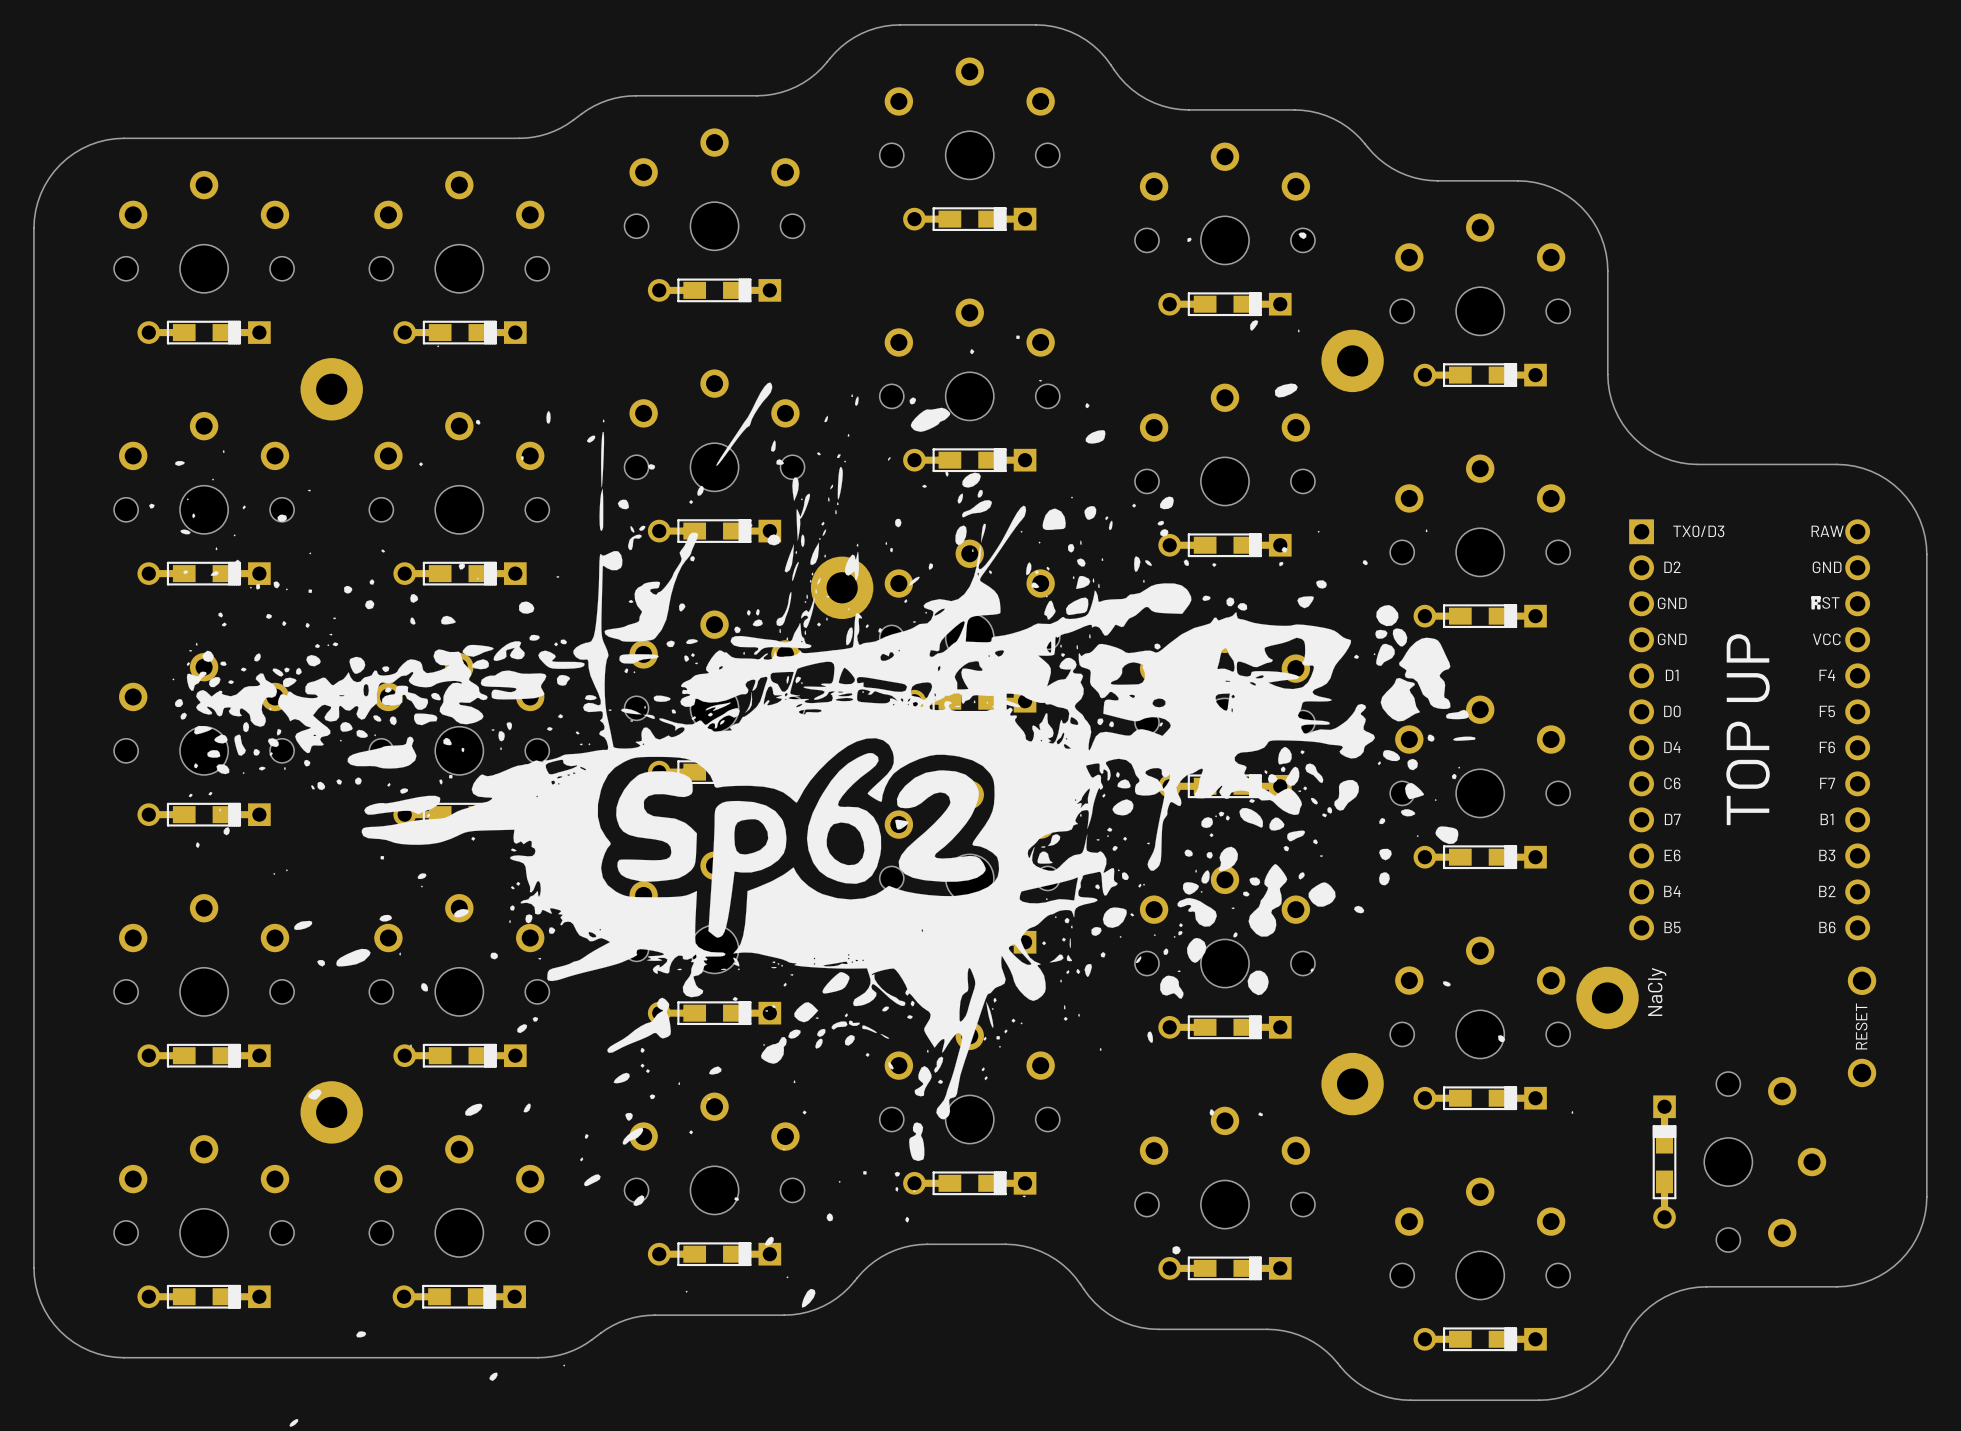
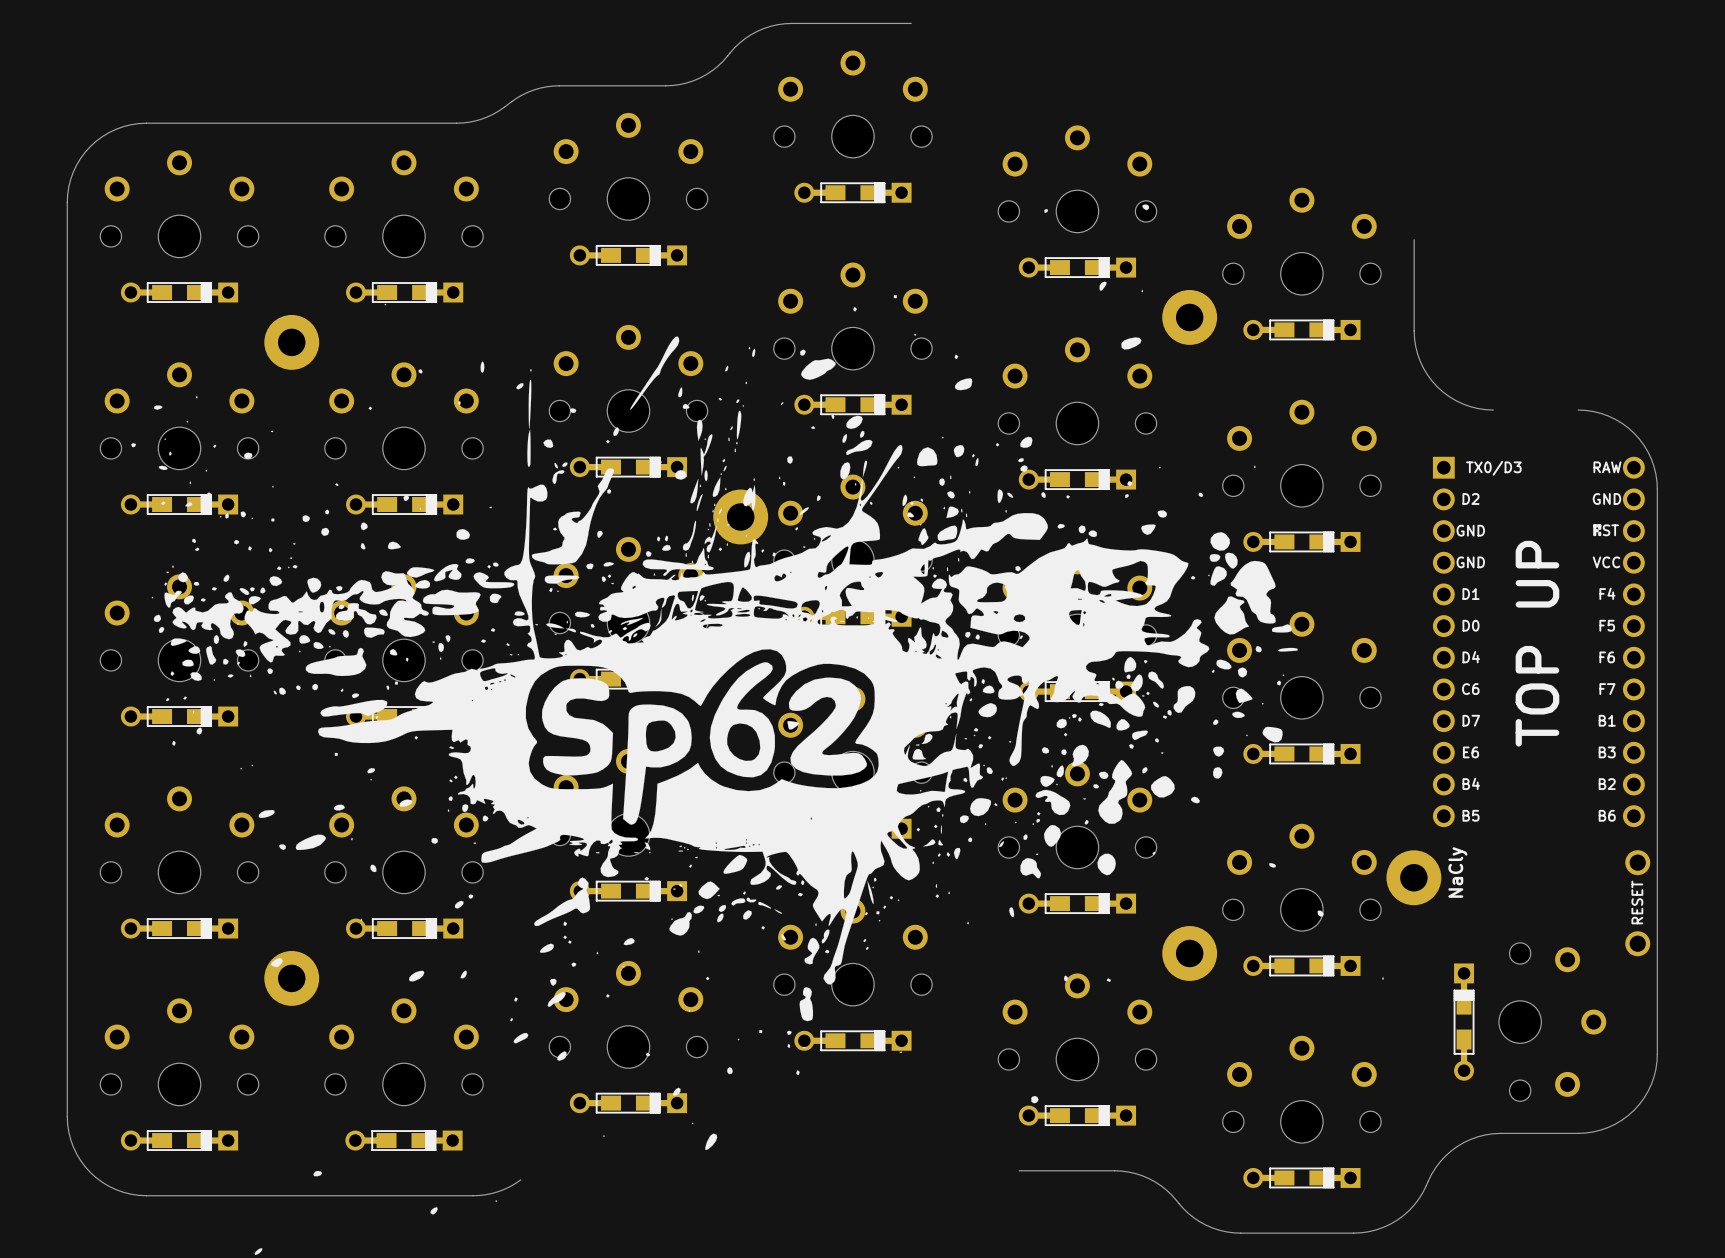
board edge: none -> (911, 23) (777, 24) (751, 34) (739, 42) (712, 70) (686, 82) (665, 85) (546, 86) (528, 92) (493, 114) (469, 122) (131, 124) (116, 129) (102, 136) (85, 152) (76, 165) (70, 179) (67, 202)
board edge: none -> (67, 202) (67, 1116) (68, 1131) (73, 1146) (85, 1166) (96, 1177) (116, 1189) (138, 1195) (479, 1195) (498, 1191) (520, 1179)
board edge: (1607, 272) (1603, 244) (1592, 220) (1574, 201) (1552, 187) (1526, 181) (1437, 180) (1413, 177) (1385, 163) (1353, 132) (1340, 122) (1310, 111) (1189, 109) (1162, 106) (1146, 99) (1131, 89) (1099, 51) (1086, 40) (1070, 31) (1044, 25) (884, 26) (854, 37) (841, 47) (809, 78) (780, 92) (756, 95) (621, 96) (600, 102) (560, 128) (533, 137) (123, 138) (97, 142) (73, 153) (60, 164) (44, 185) (37, 202) (33, 228) (33, 1267) (37, 1293) (49, 1317) (60, 1331) (81, 1347) (97, 1353) (115, 1357) (545, 1357) (573, 1350) (612, 1325) (640, 1316) (784, 1315) (808, 1311) (836, 1298) (874, 1261) (903, 1247) (927, 1244) (1014, 1244) (1040, 1251) (1055, 1259) (1069, 1270) (1101, 1308) (1116, 1318) (1132, 1325) (1158, 1329) (1267, 1329) (1291, 1332) (1320, 1346) (1351, 1378) (1364, 1387) (1394, 1398) (1539, 1400) (1556, 1398) (1573, 1393) (1595, 1380) (1613, 1361) (1637, 1318) (1657, 1301) (1672, 1293) (1689, 1288) (1706, 1286) (1845, 1286) (1862, 1282) (1886, 1271) (1906, 1253) (1916, 1239) (1925, 1214) (1926, 1196) (1926, 554) (1922, 528) (1916, 512) (1900, 490) (1879, 475) (1862, 468) (1836, 464) (1689, 464) (1671, 460) (1655, 453) (1634, 438) (1618, 416) (1609, 391) (1607, 374) -> (1493, 410) (1477, 408) (1463, 404) (1449, 396) (1437, 386) (1427, 374) (1420, 361) (1415, 346) (1414, 329)
board edge: none -> (1578, 410) (1593, 411) (1608, 416) (1622, 423) (1634, 433) (1647, 451) (1653, 466) (1656, 481) (1657, 1054) (1653, 1077) (1644, 1098) (1634, 1110) (1622, 1120) (1608, 1127) (1593, 1131) (1493, 1133) (1464, 1142) (1440, 1161) (1418, 1199) (1403, 1215) (1383, 1227) (1361, 1232) (1226, 1231) (1200, 1221) (1188, 1213) (1161, 1185) (1135, 1173) (1114, 1170) (1019, 1170)

